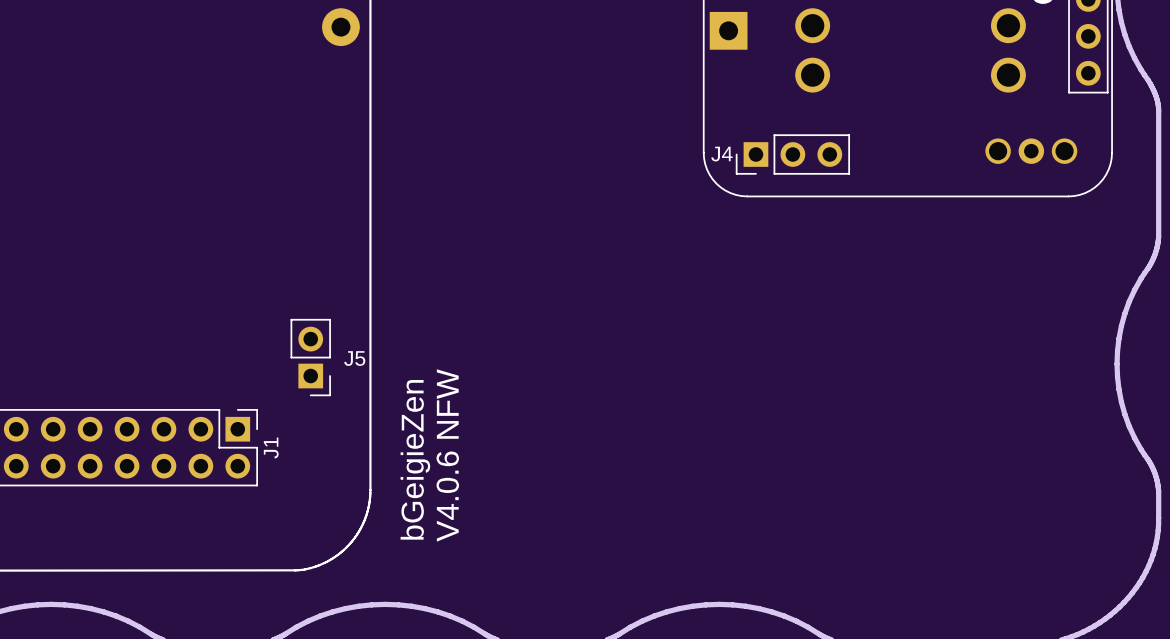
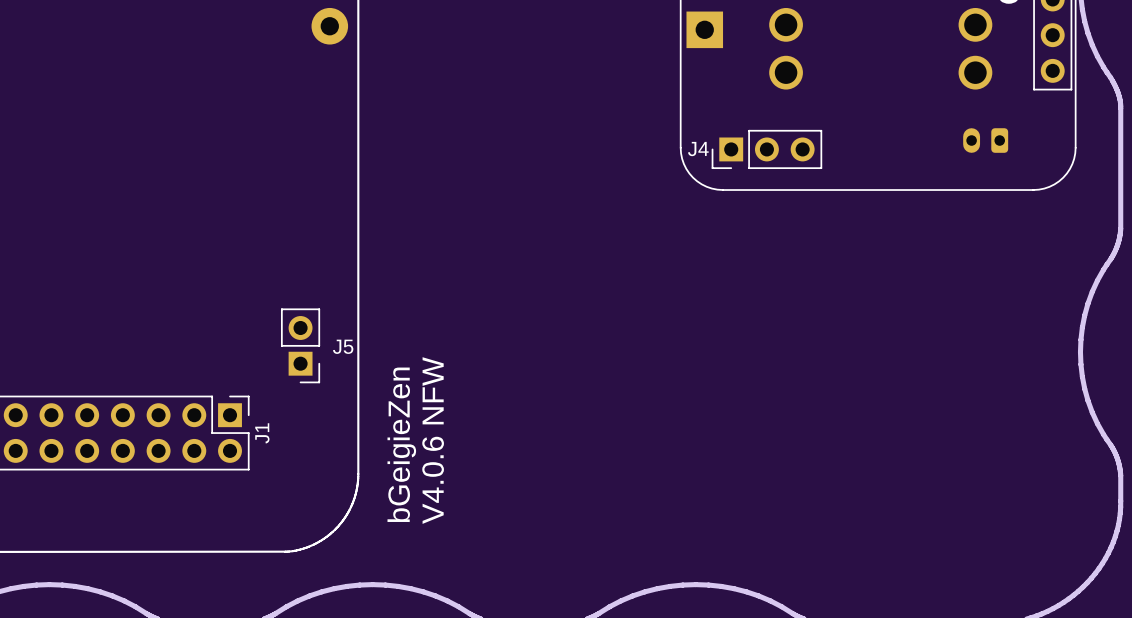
part footprint: [985, 138, 1078, 164] -> [963, 128, 1009, 153]

